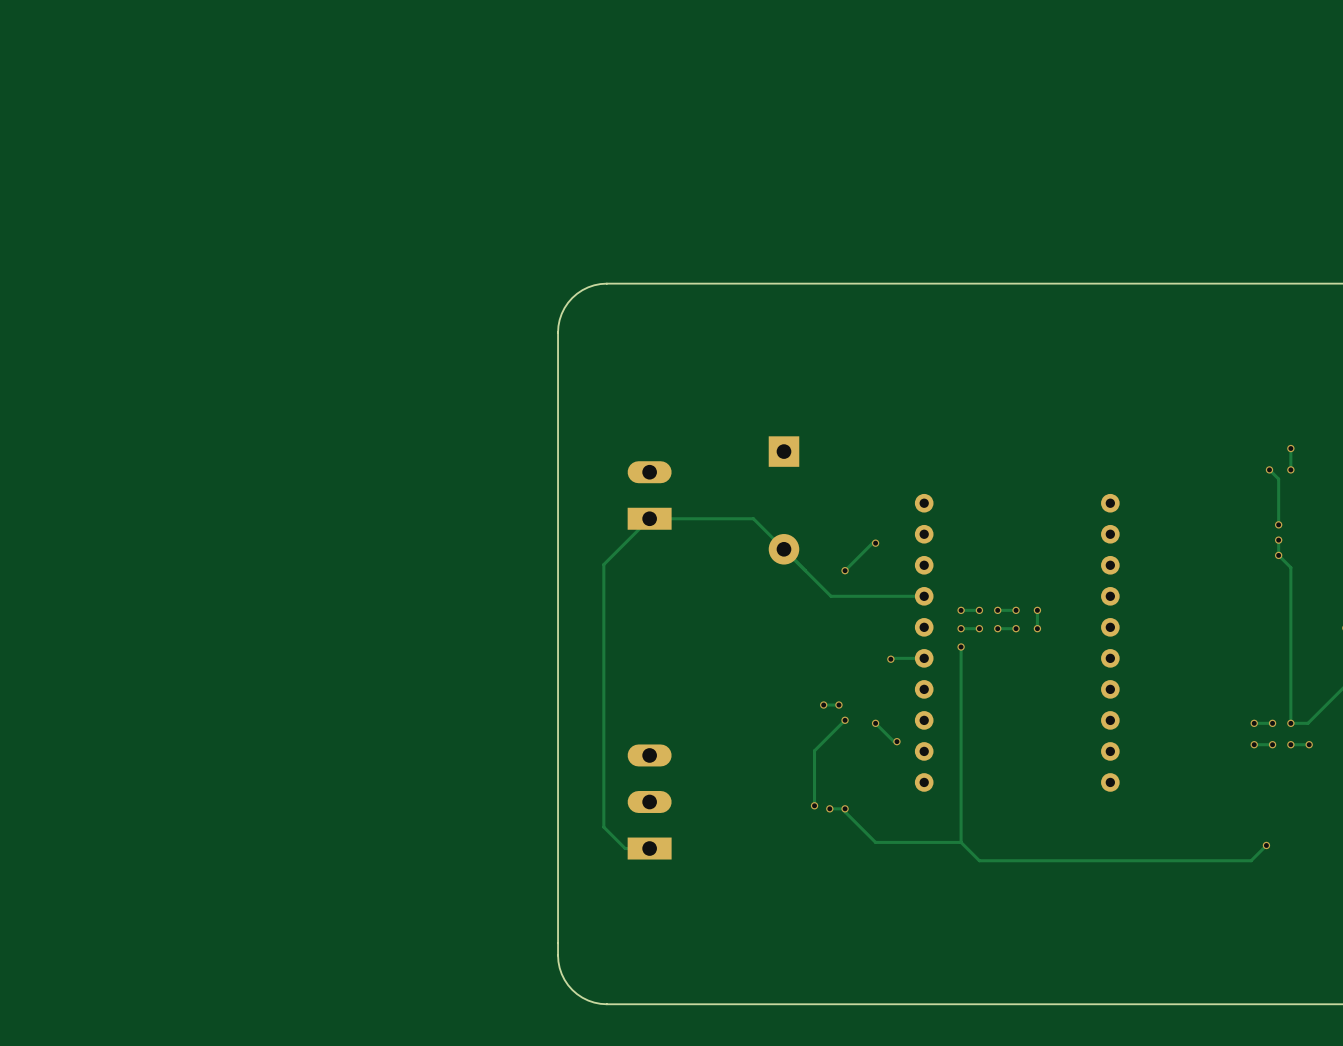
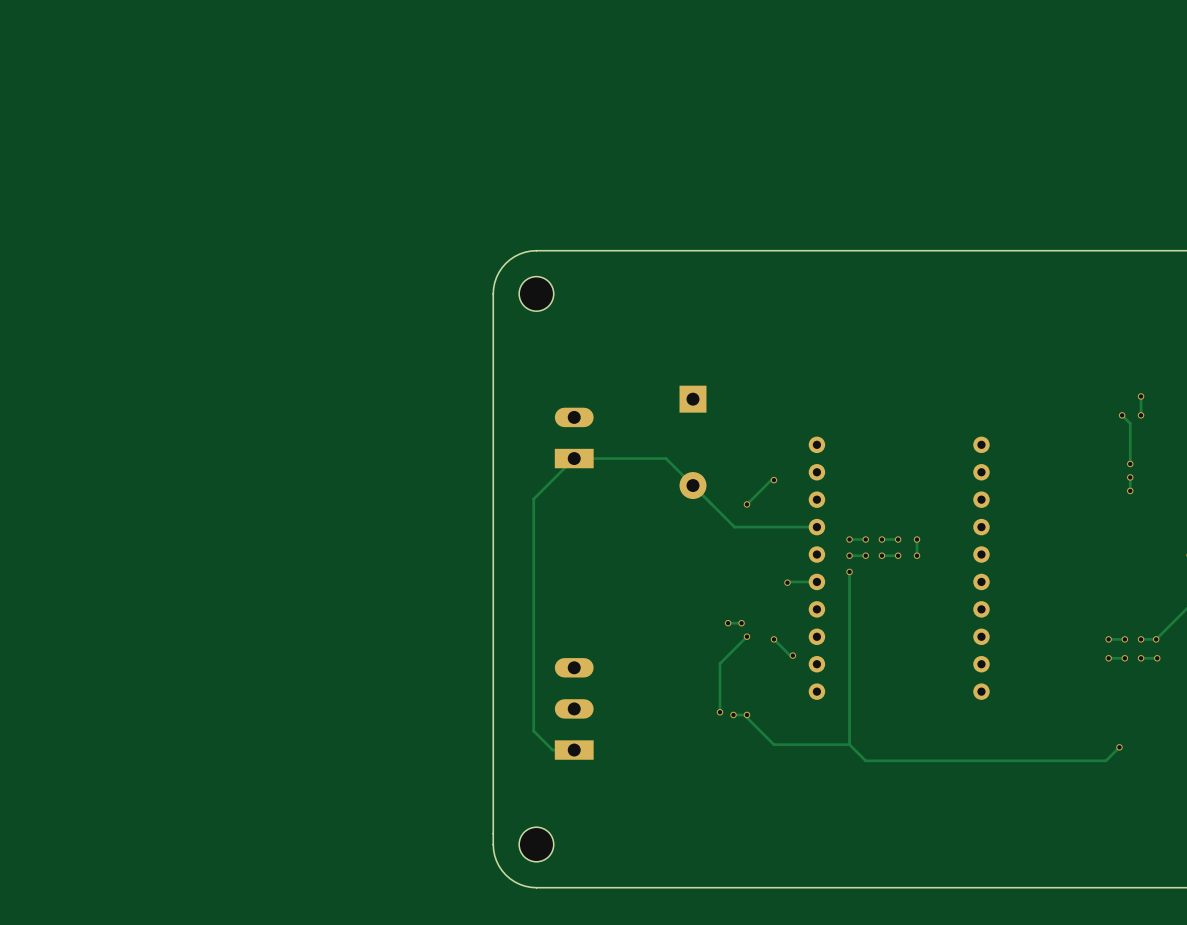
part: none -> (536, 293)
track: (1278, 555) (1290, 567) (1290, 723) -> none
via: none -> (1156, 639)
part: none -> (536, 844)

